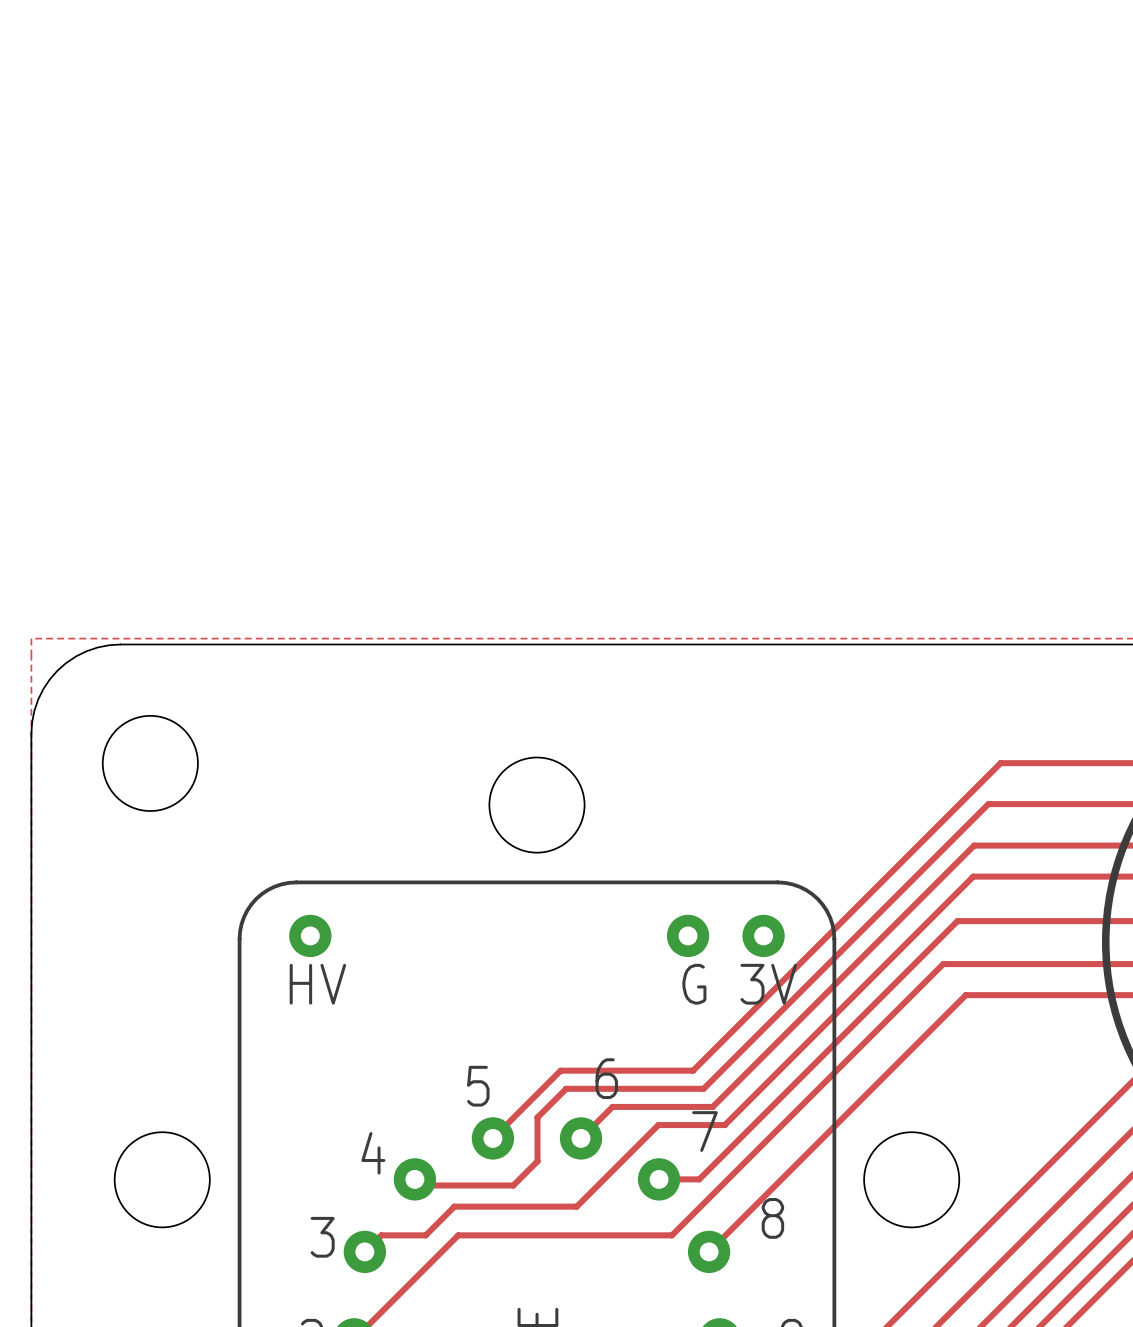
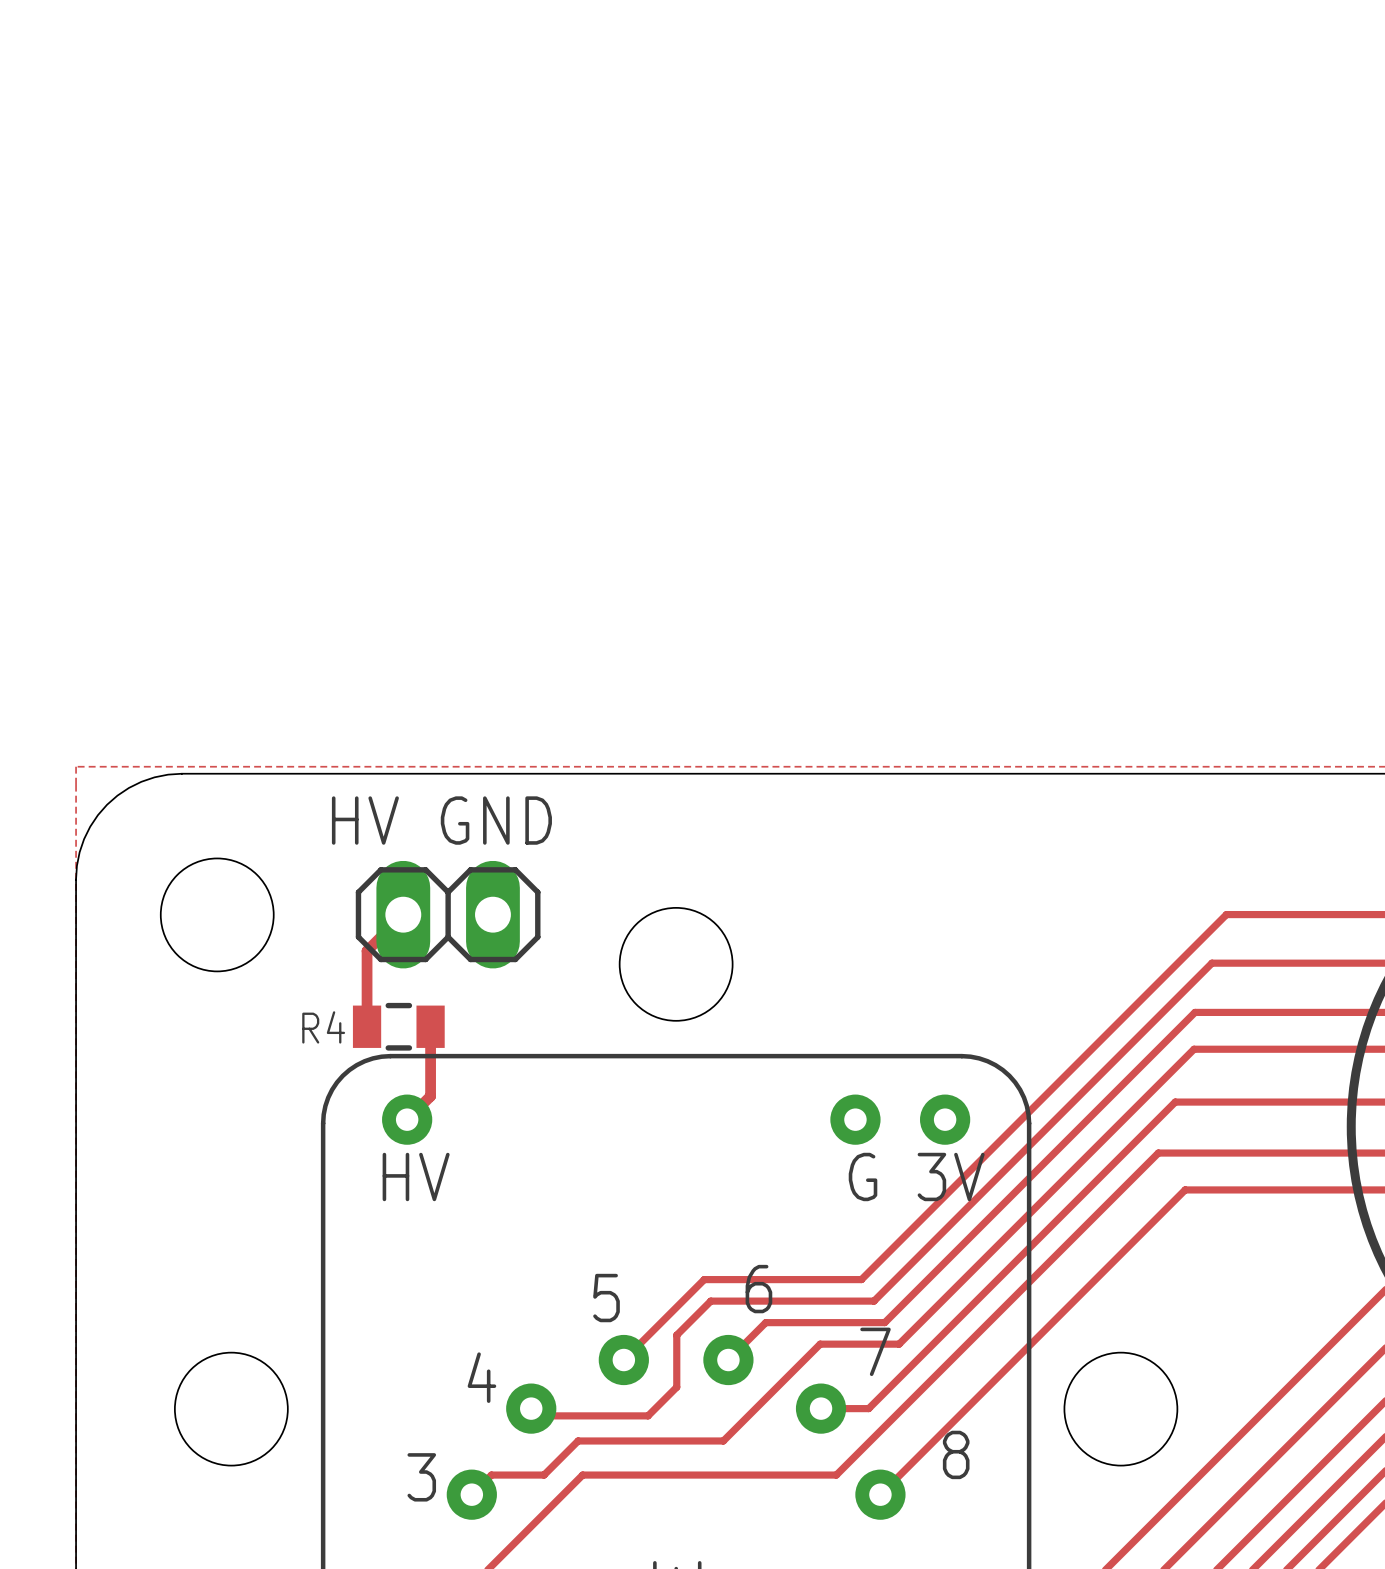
text: none -> HV (365, 820)
text: none -> GND (496, 820)
track: none -> (403, 914) (367, 950) (367, 1026)
part: none -> (448, 914)
R4: none -> (398, 1026)
track: none -> (430, 1026) (430, 1096) (407, 1119)

